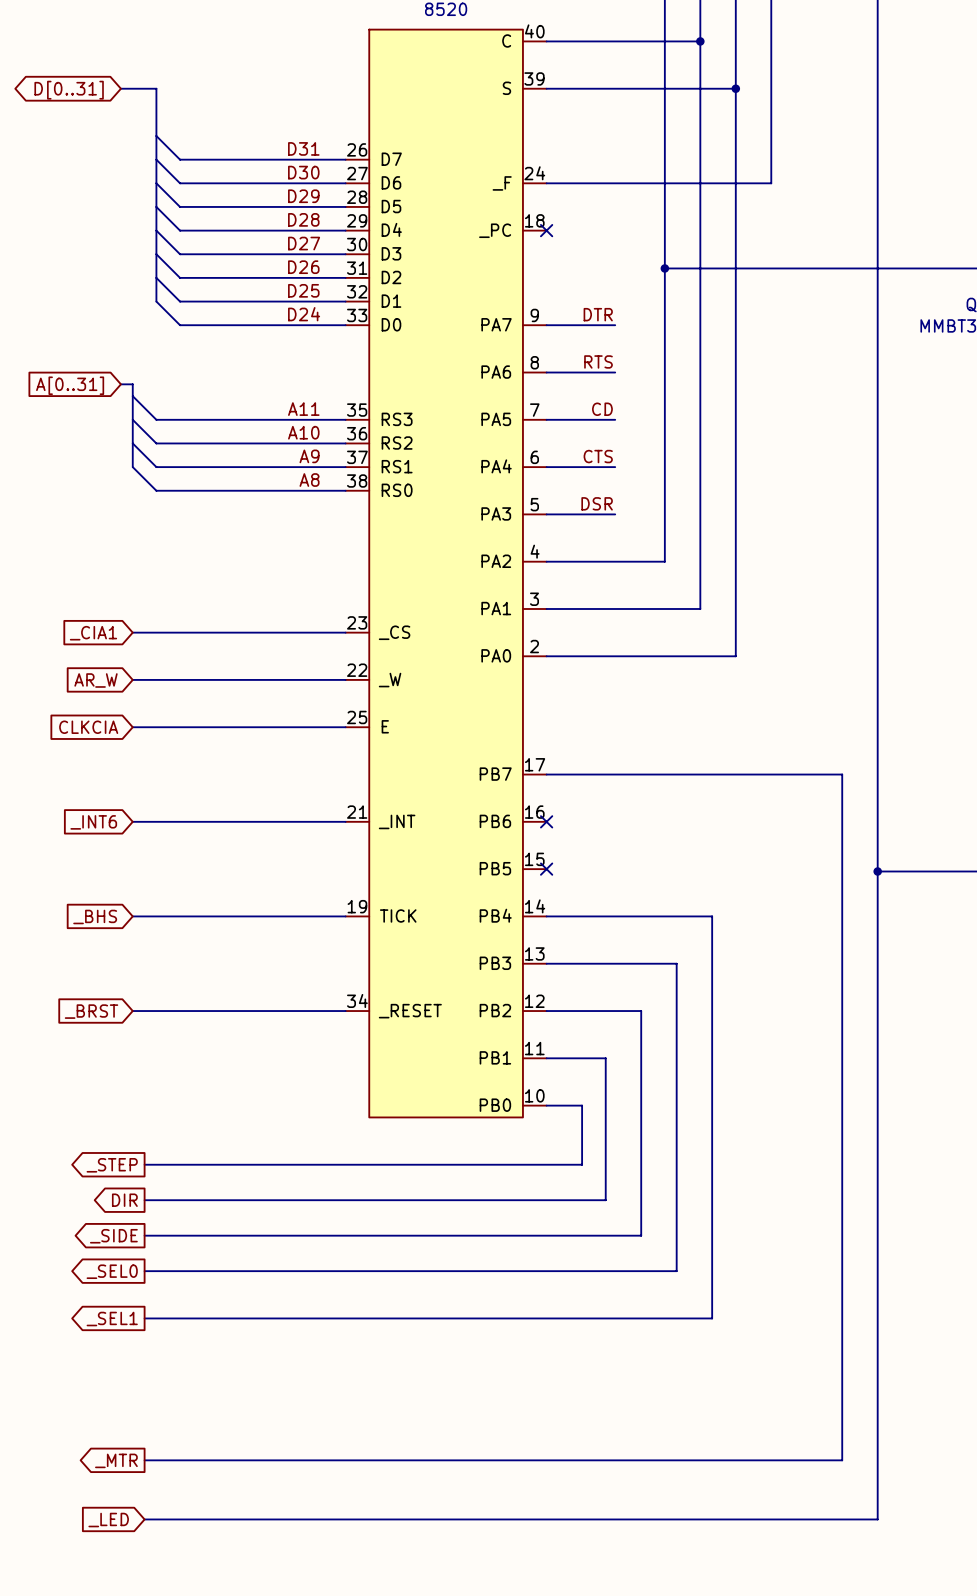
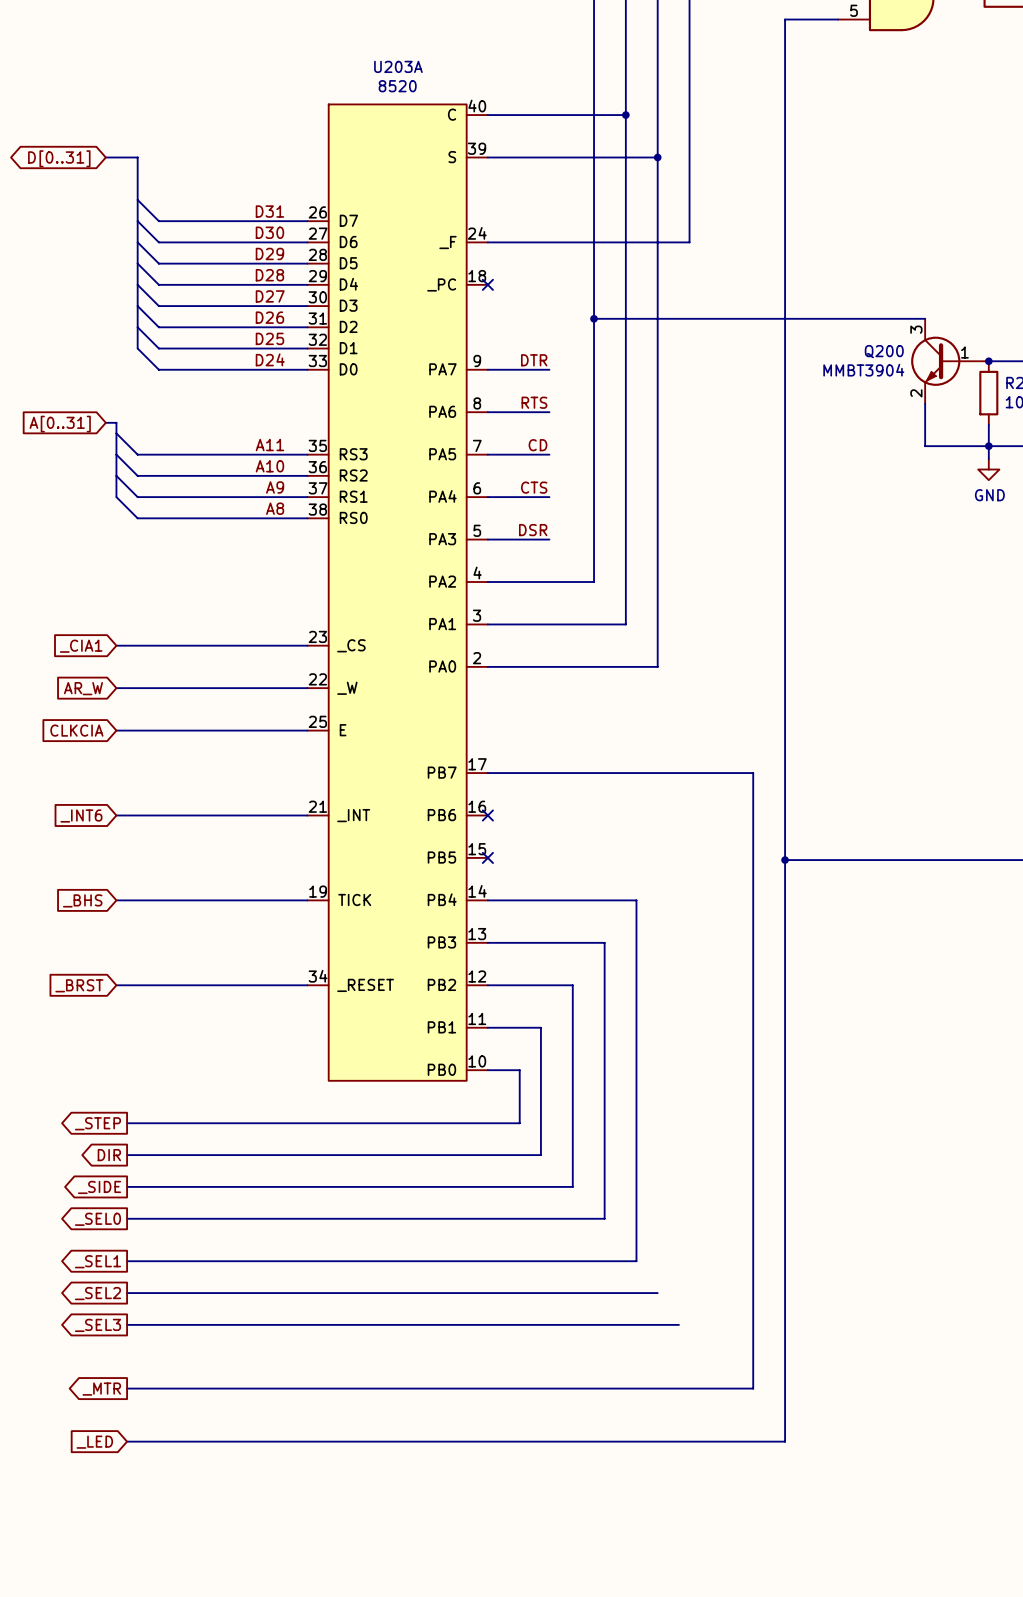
wire: none -> (127, 1293) (657, 1293)
global label: none -> _SEL2 (97, 1293)
global label: none -> _SEL3 (97, 1325)
wire: none -> (127, 1324) (678, 1324)

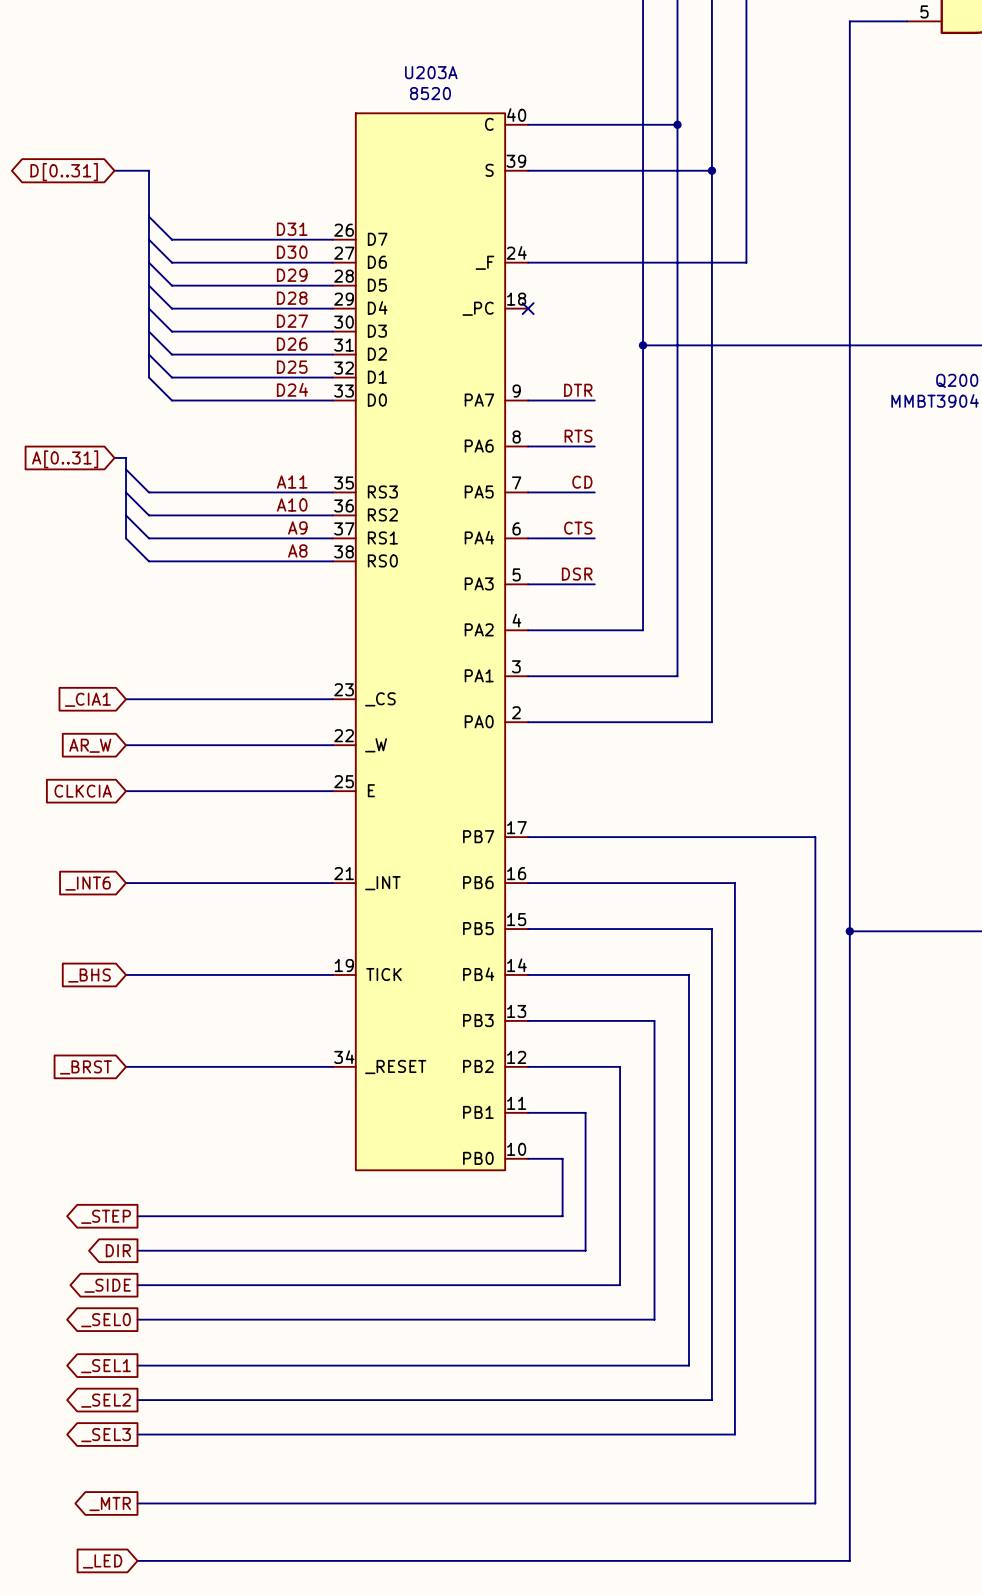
wire: none -> (528, 883) (734, 883) (734, 1434)
no-connect mark: (487, 815) -> none
wire: none -> (528, 929) (711, 929) (711, 1400)
no-connect mark: (487, 857) -> none

